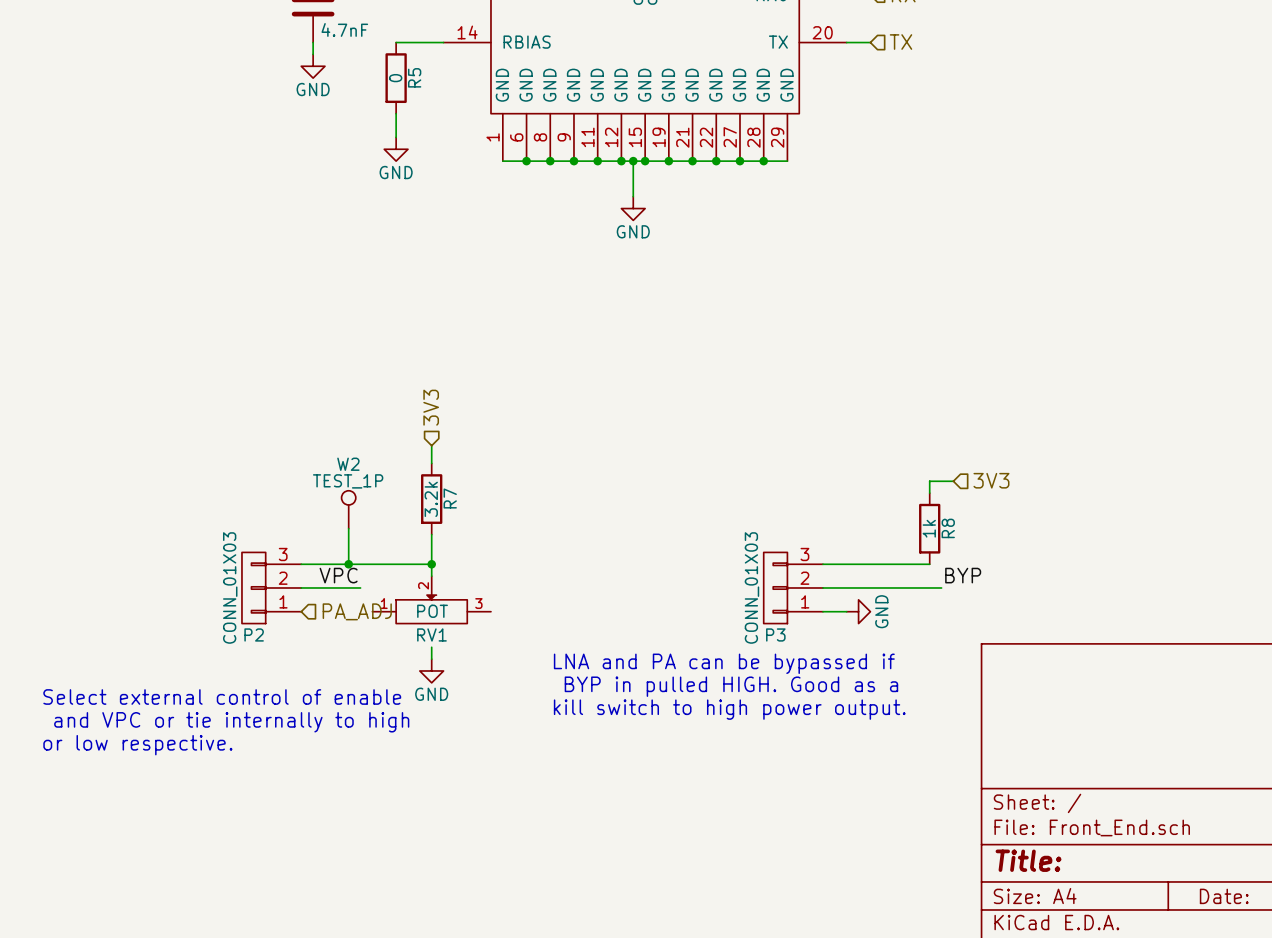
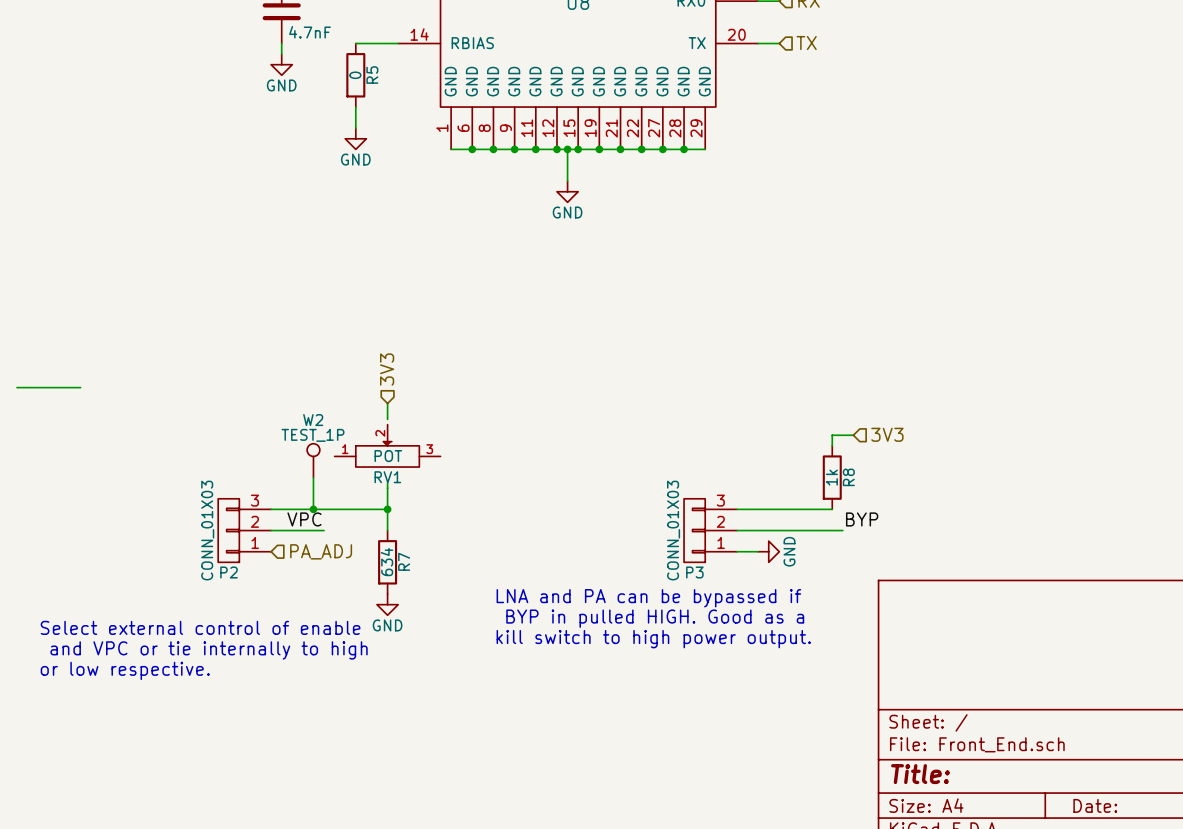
wire: none -> (17, 387) (80, 387)
R7 position: (431, 499) -> (387, 562)
R7 value: 3.2k (431, 499) -> 634 (386, 562)
RV1 position: (431, 599) -> (387, 445)

